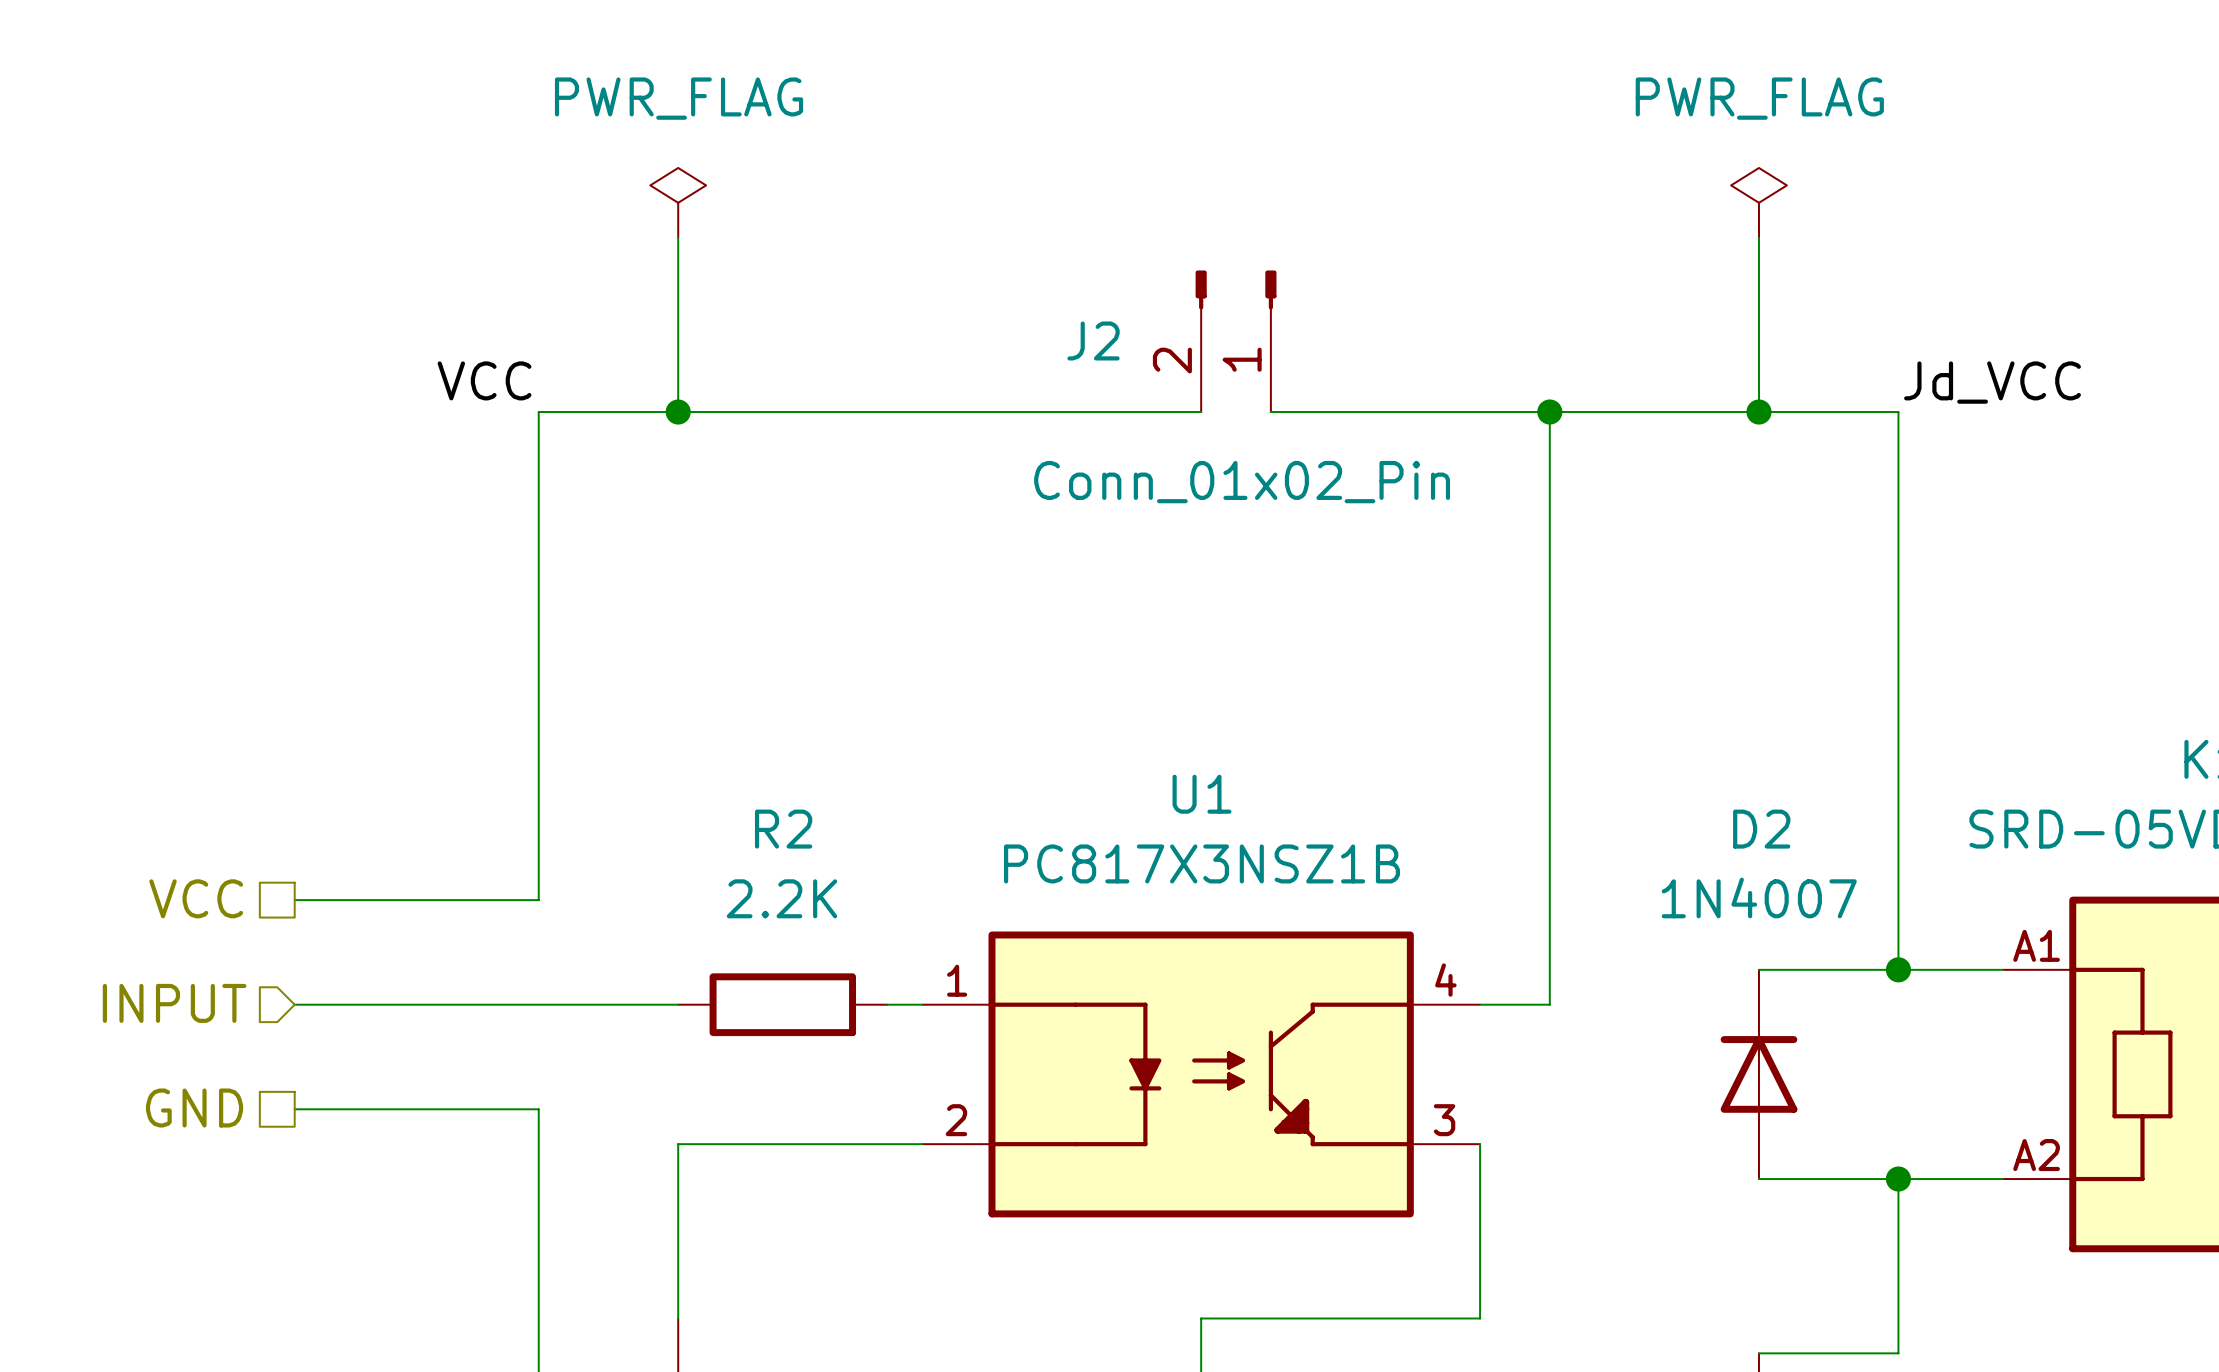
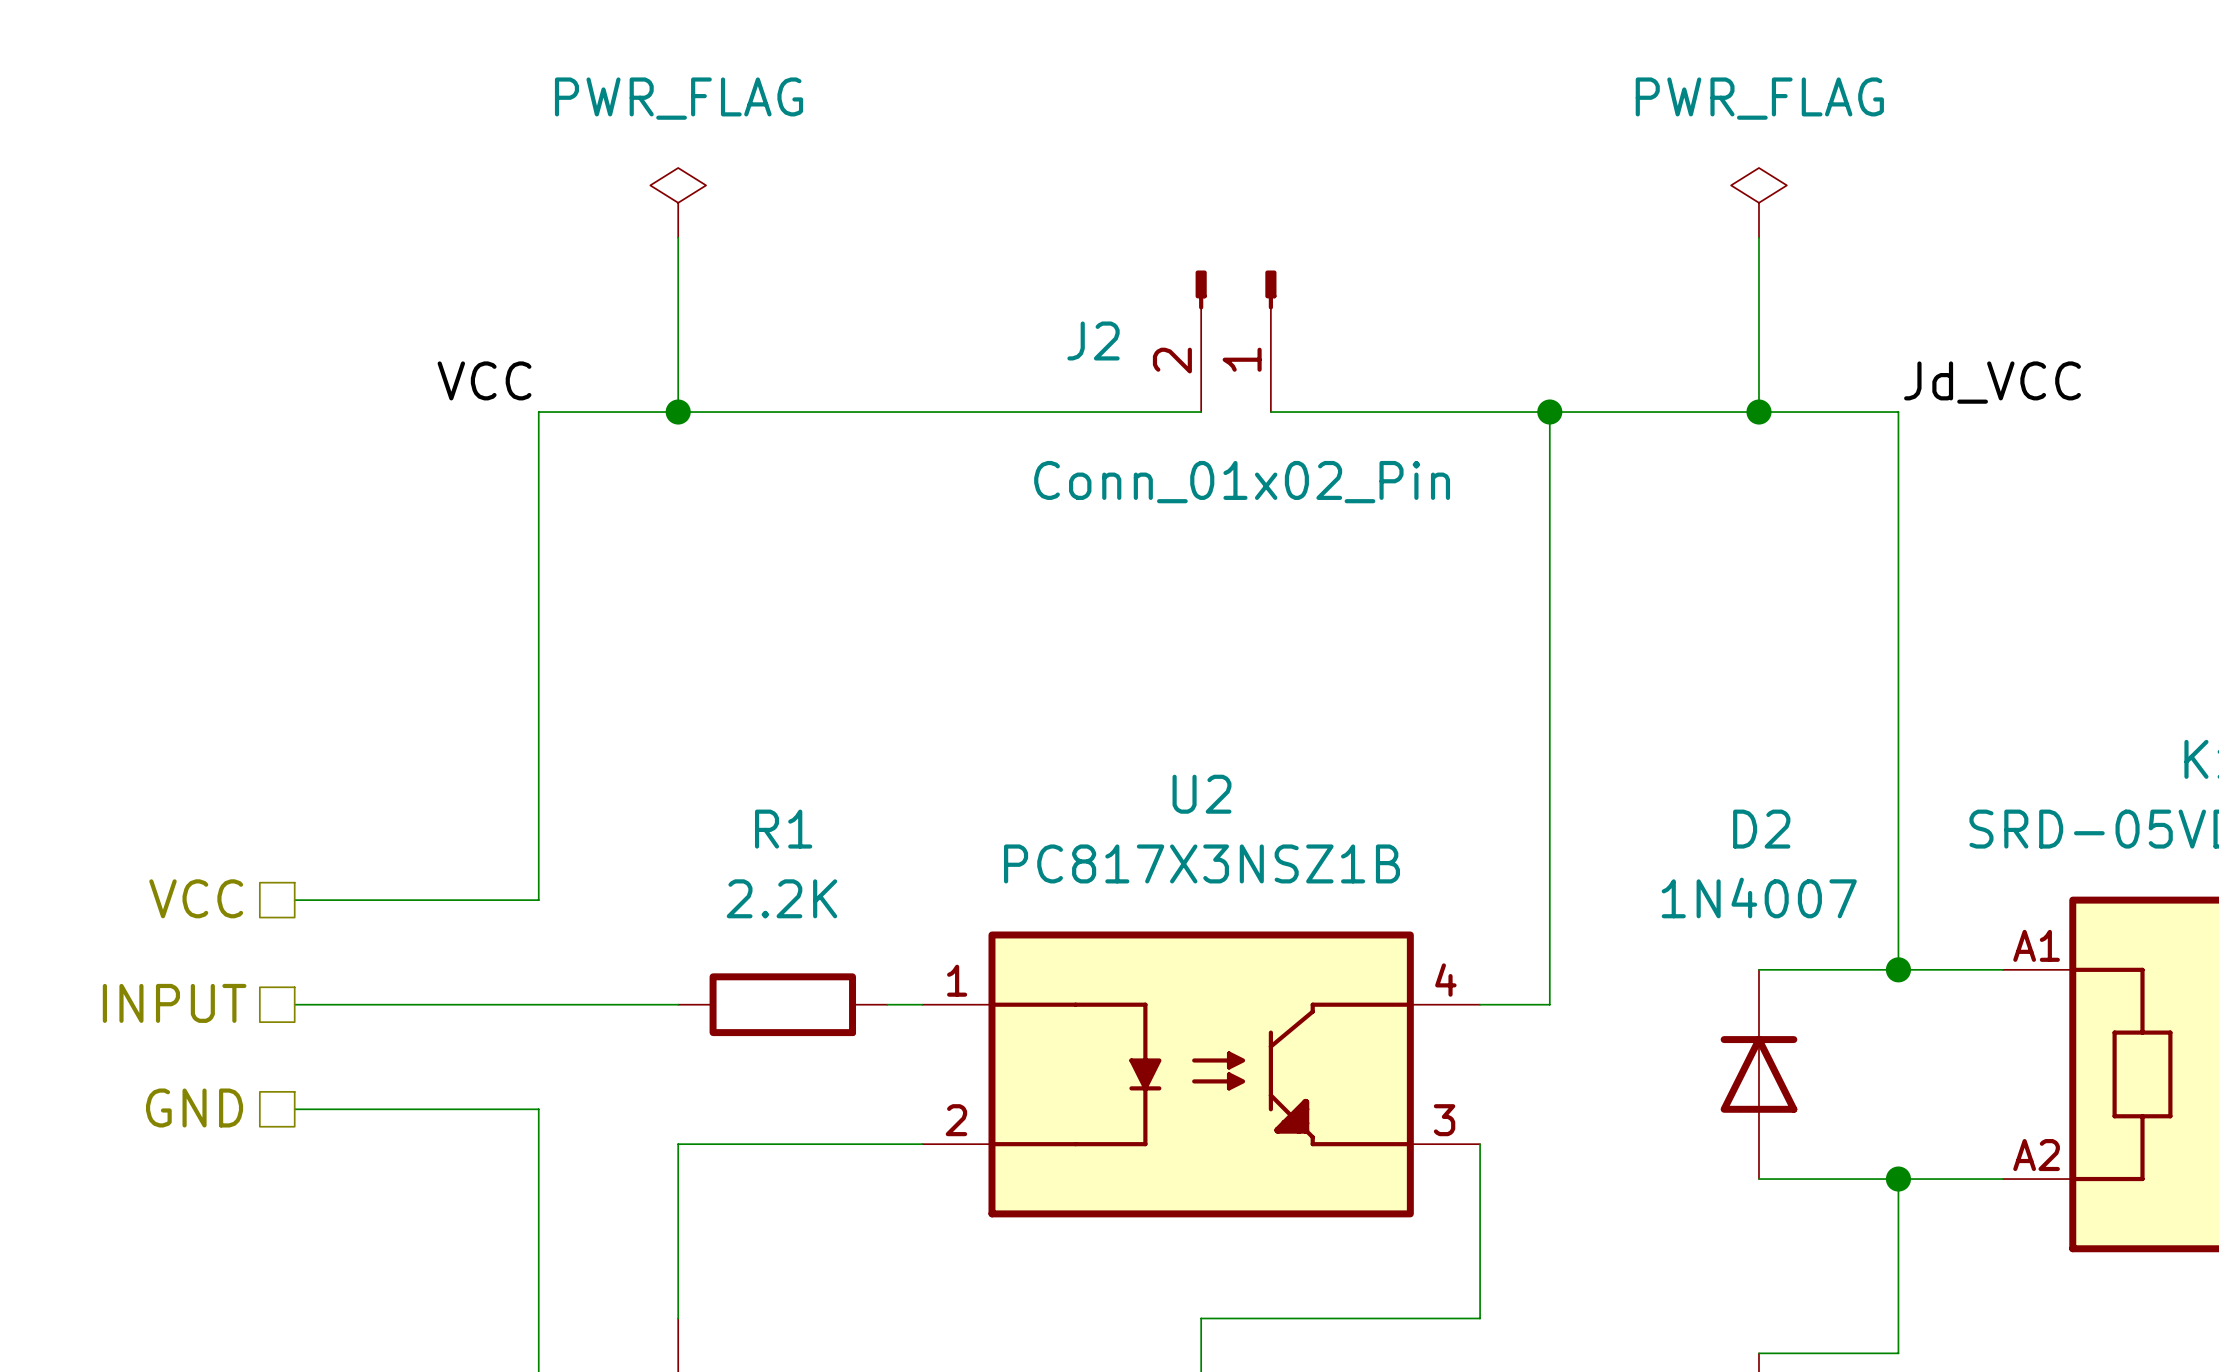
U1 name: U1 (1201, 794) -> U2 (1201, 794)
R2 name: R2 (783, 829) -> R1 (783, 829)
hierarchical label shape: input (174, 1003) -> passive (174, 1003)

